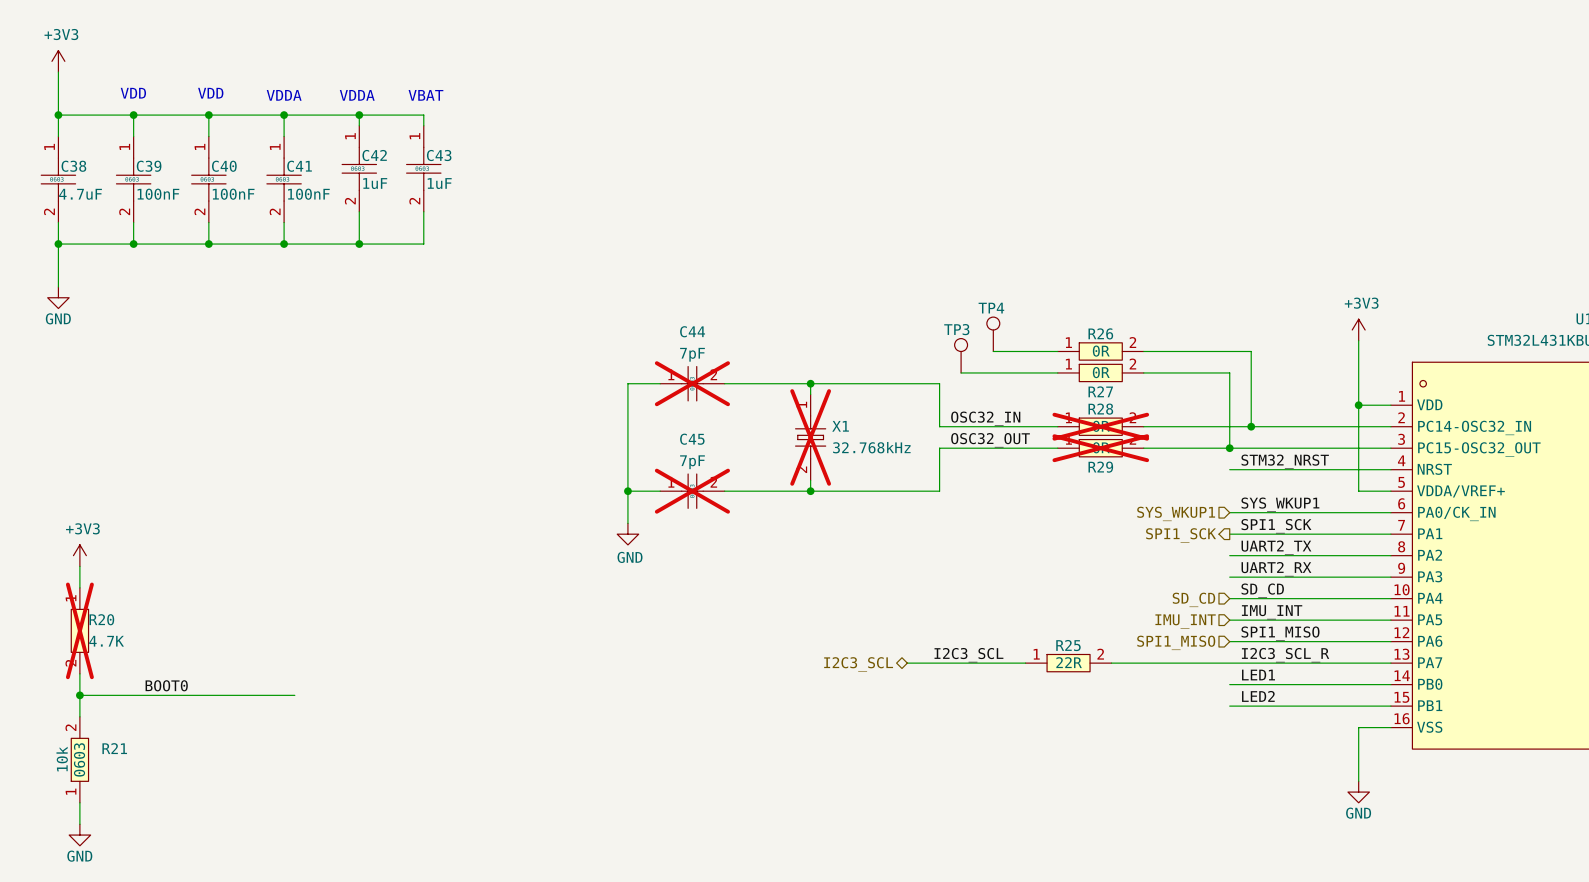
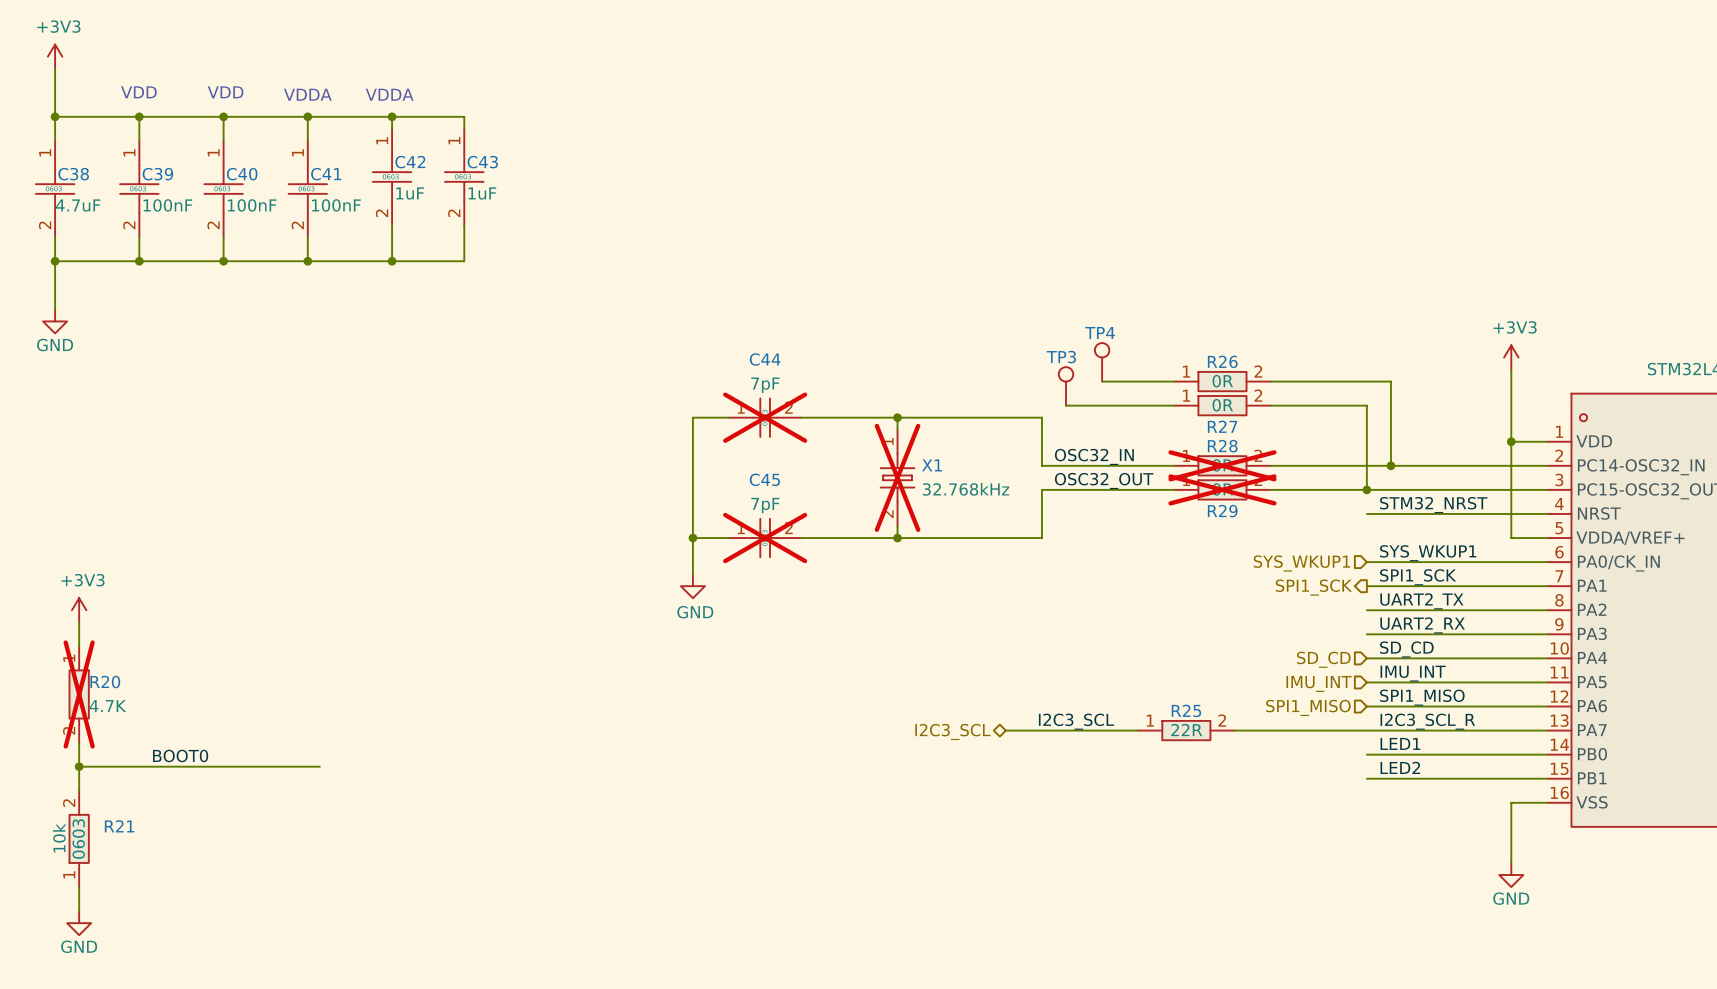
text: VBAT (425, 95) -> none

